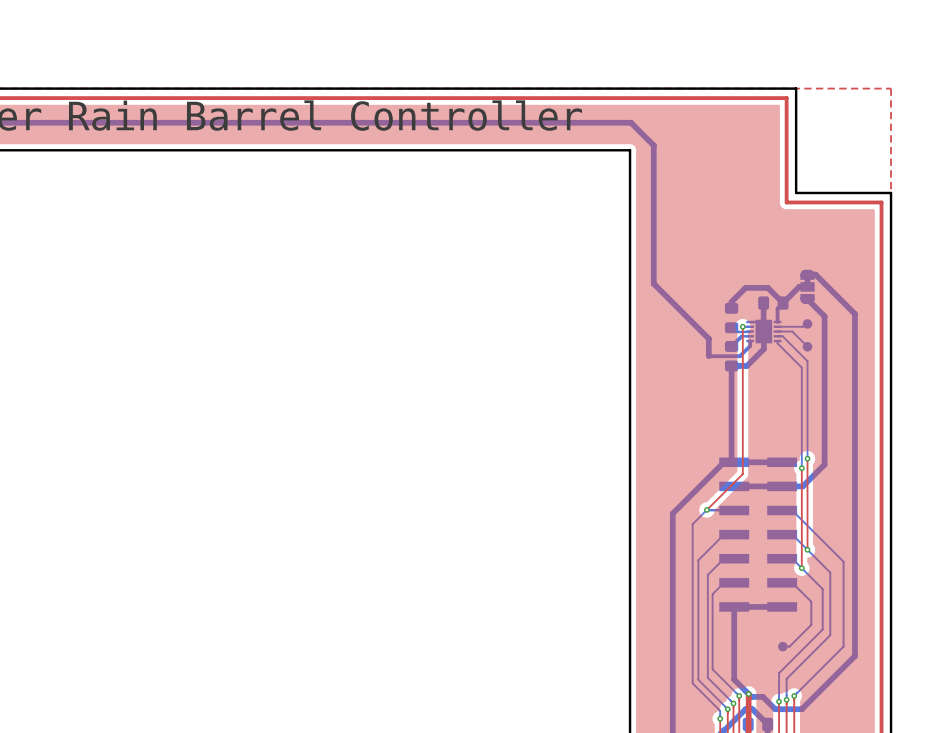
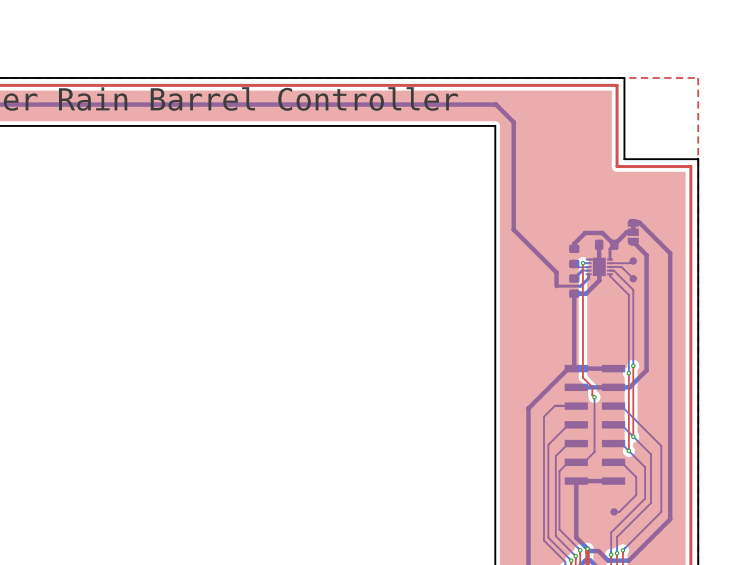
top track: (742, 474) (706, 509) -> (582, 377) (592, 387) (592, 394) (594, 397)
bottom track: none -> (594, 397) (594, 452) (584, 462) (576, 462)
via position: (706, 509) -> (594, 397)

